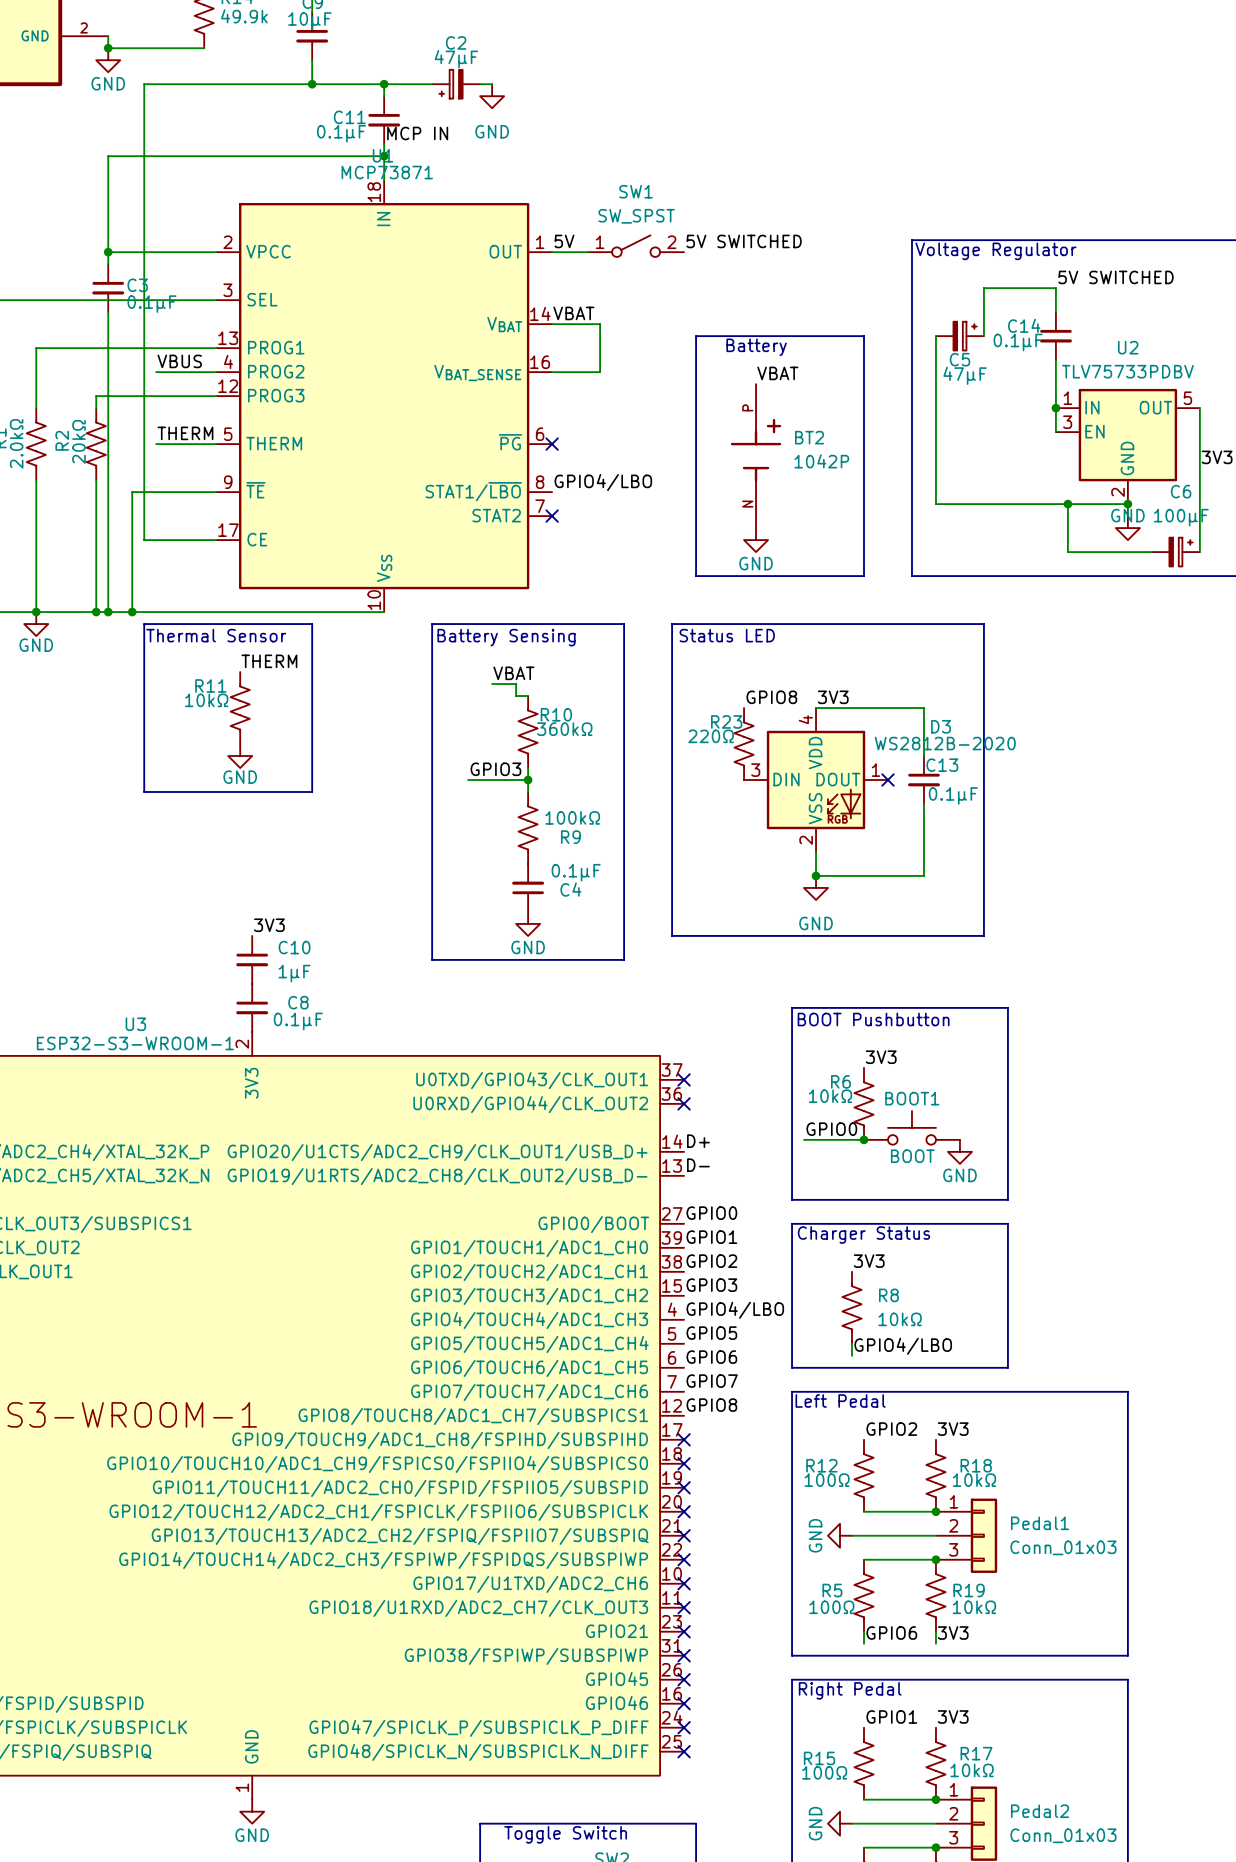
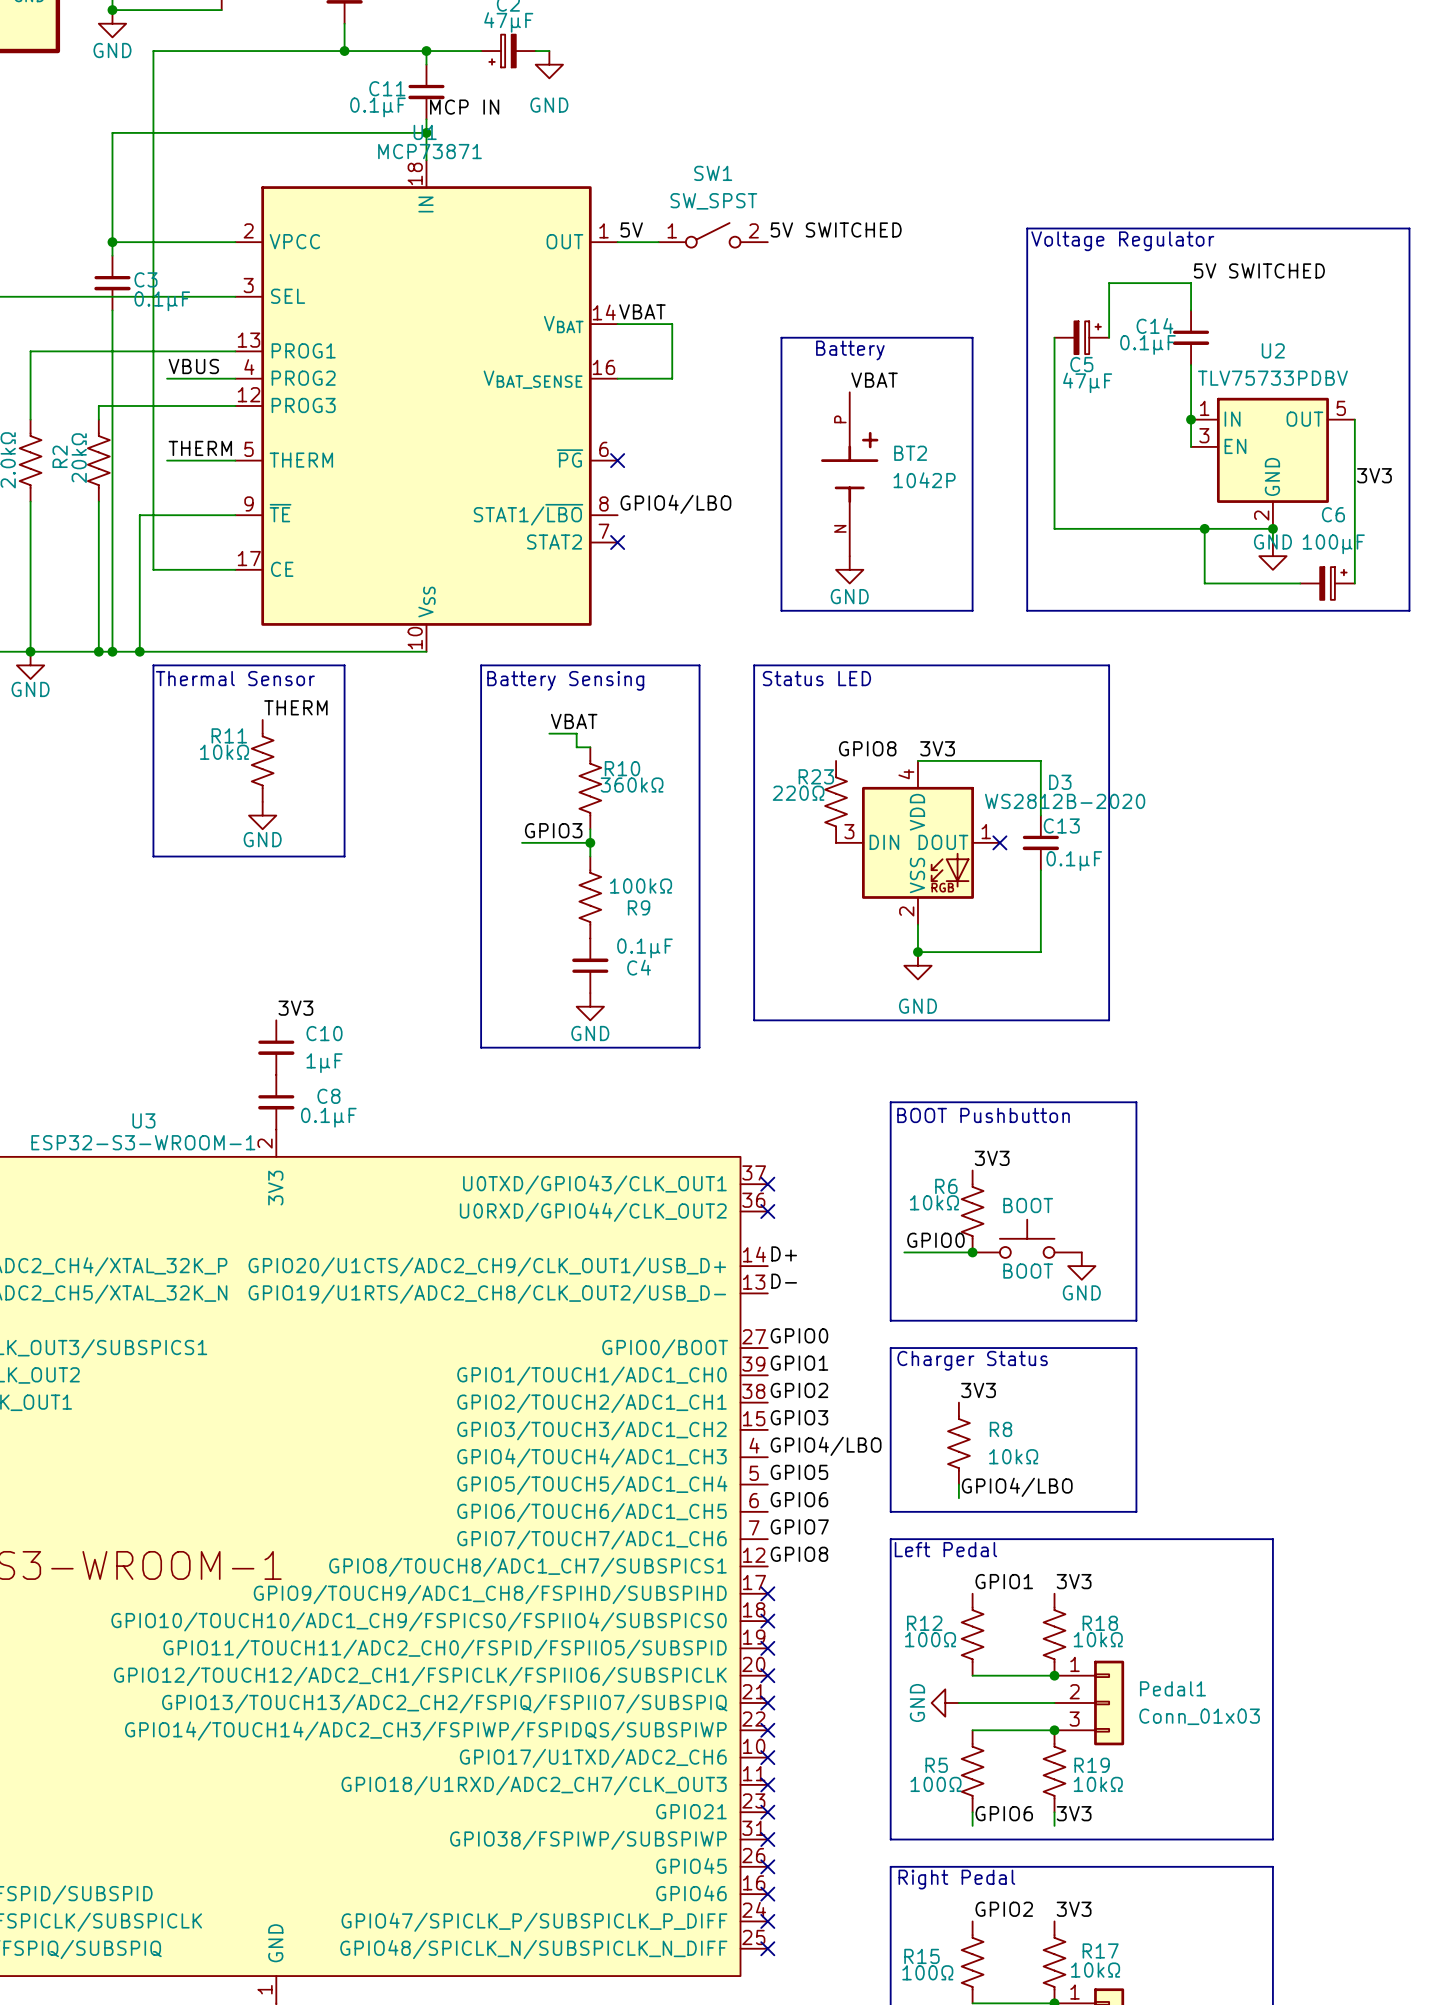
BOOT1 name: BOOT1 (912, 1098) -> BOOT (1028, 1205)
label: GPIO2 (891, 1429) -> GPIO1 (1004, 1581)
label: GPIO1 (891, 1716) -> GPIO2 (1004, 1909)

